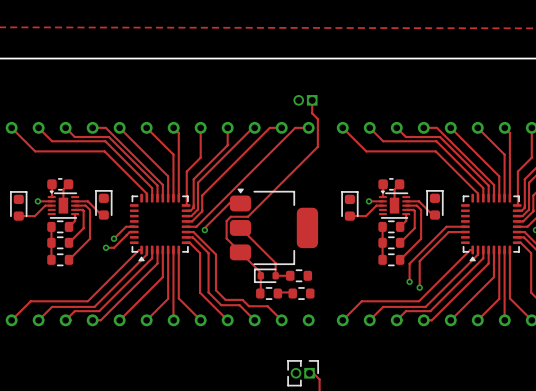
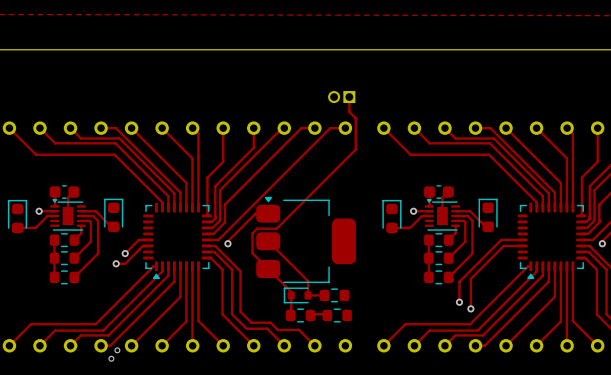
via: none -> (117, 350)
via: none -> (111, 358)

